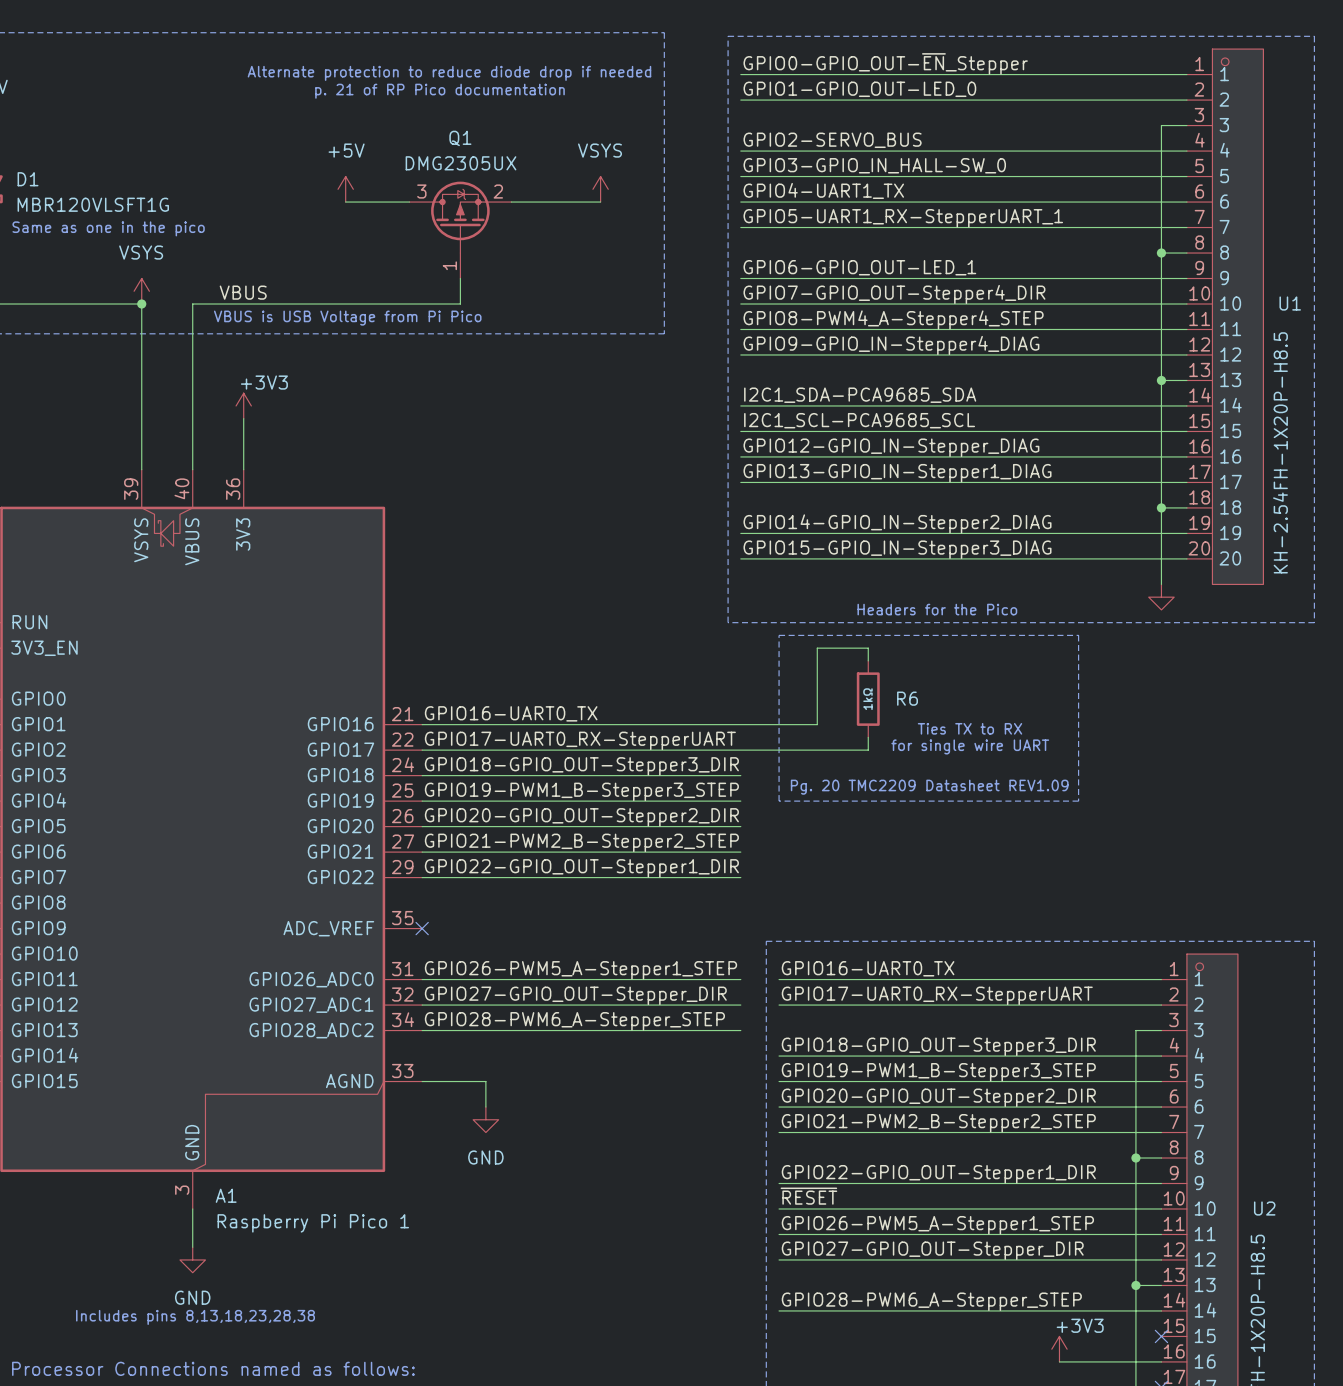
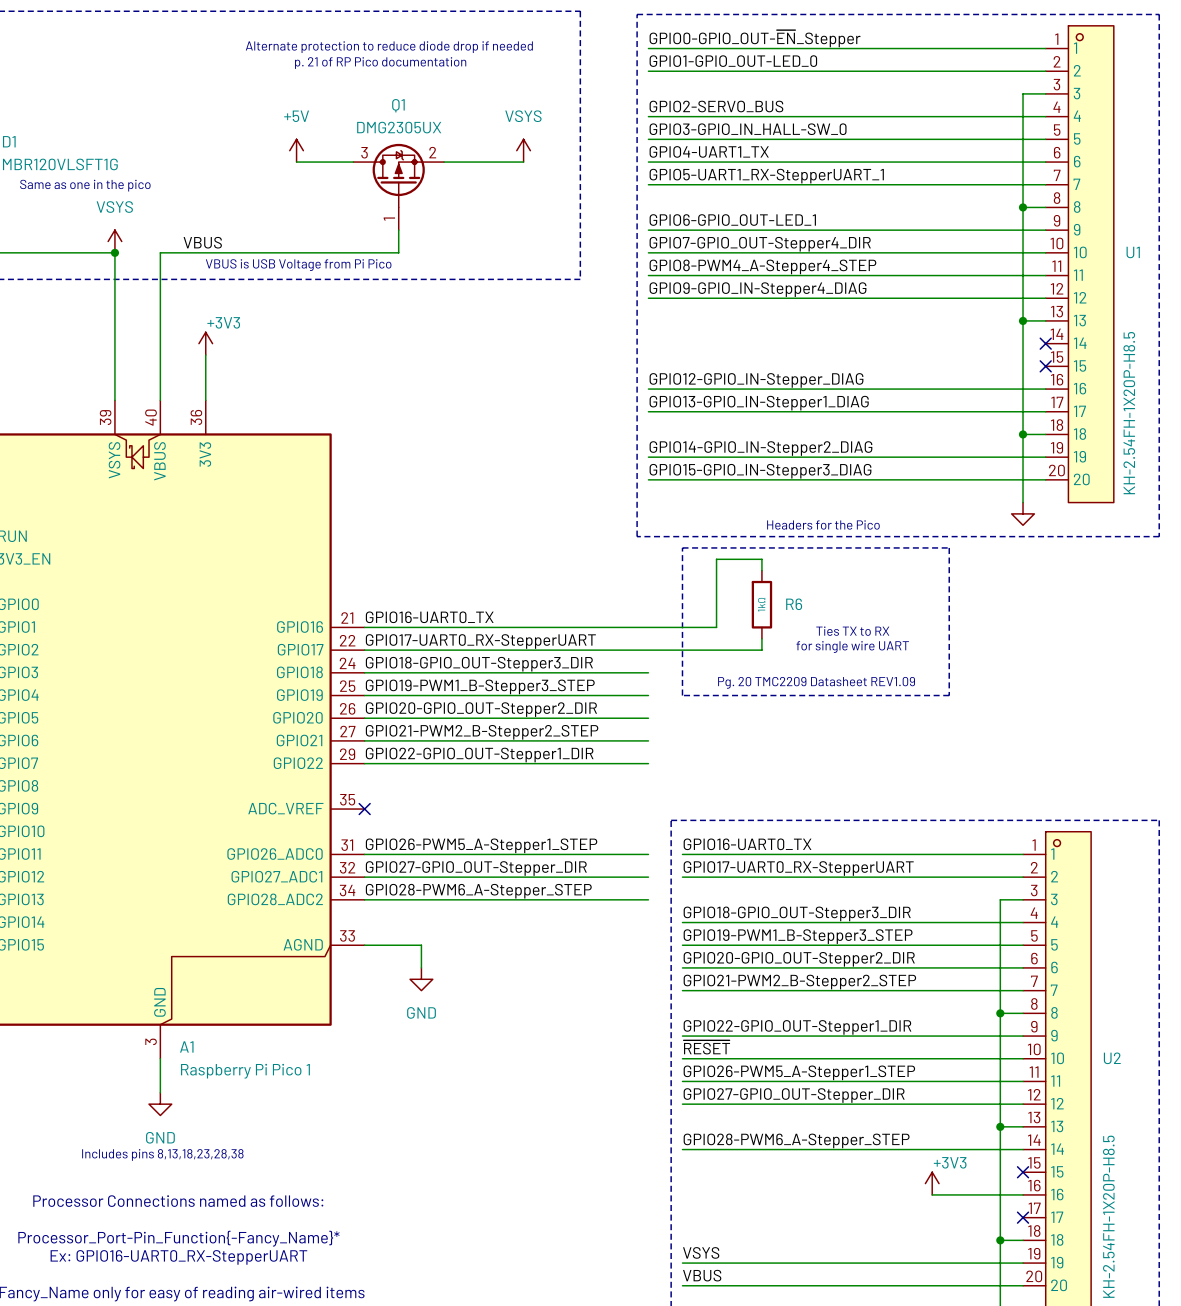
label: I2C1_SDA-PCA9685_SDA (860, 395) -> none
wire: (740, 405) (1186, 405) -> none
no-connect mark: none -> (1045, 343)
label: I2C1_SCL-PCA9685_SCL (859, 420) -> none
wire: (740, 431) (1186, 431) -> none
no-connect mark: none -> (1045, 366)

